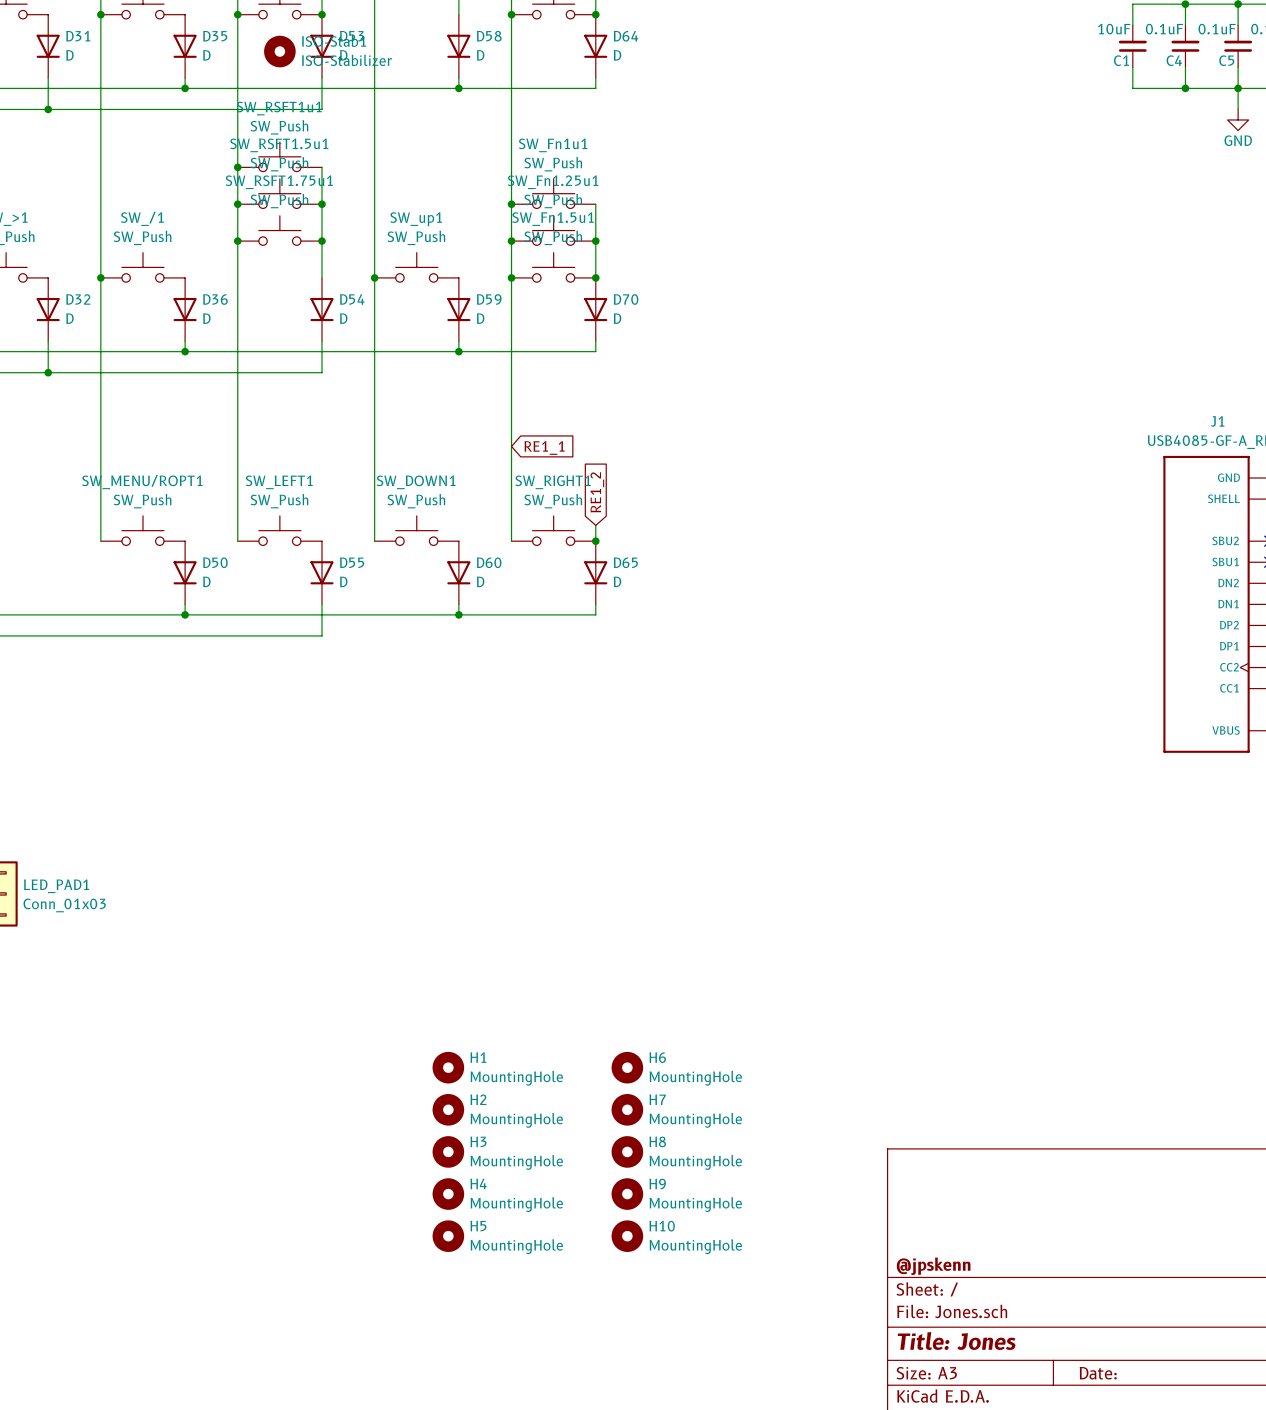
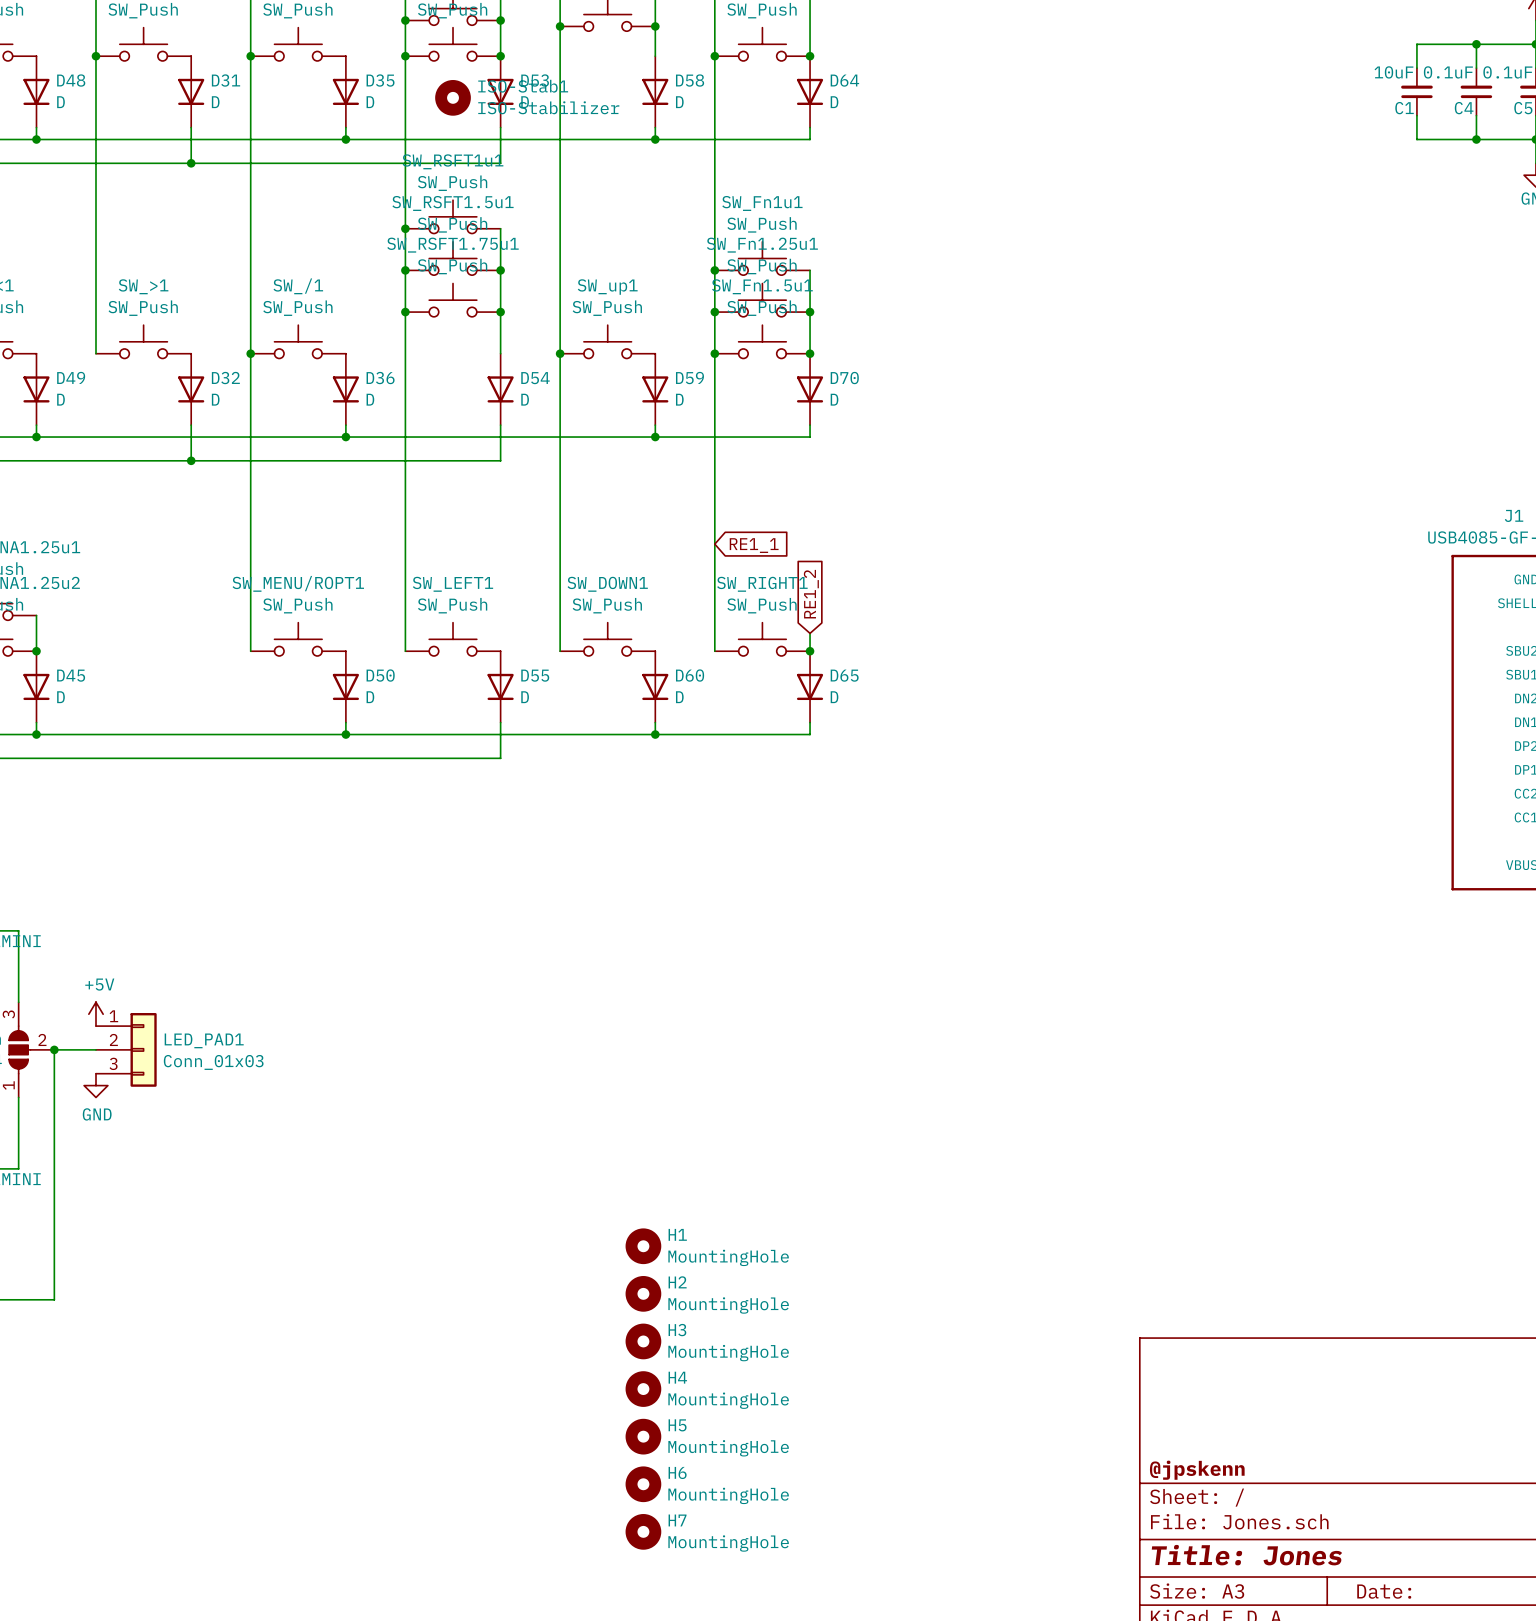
H6 position: (627, 1067) -> (643, 1484)
H7 position: (627, 1109) -> (643, 1531)
H8: MountingHole (627, 1151) -> none
H9: MountingHole (627, 1194) -> none
H10: MountingHole (627, 1236) -> none

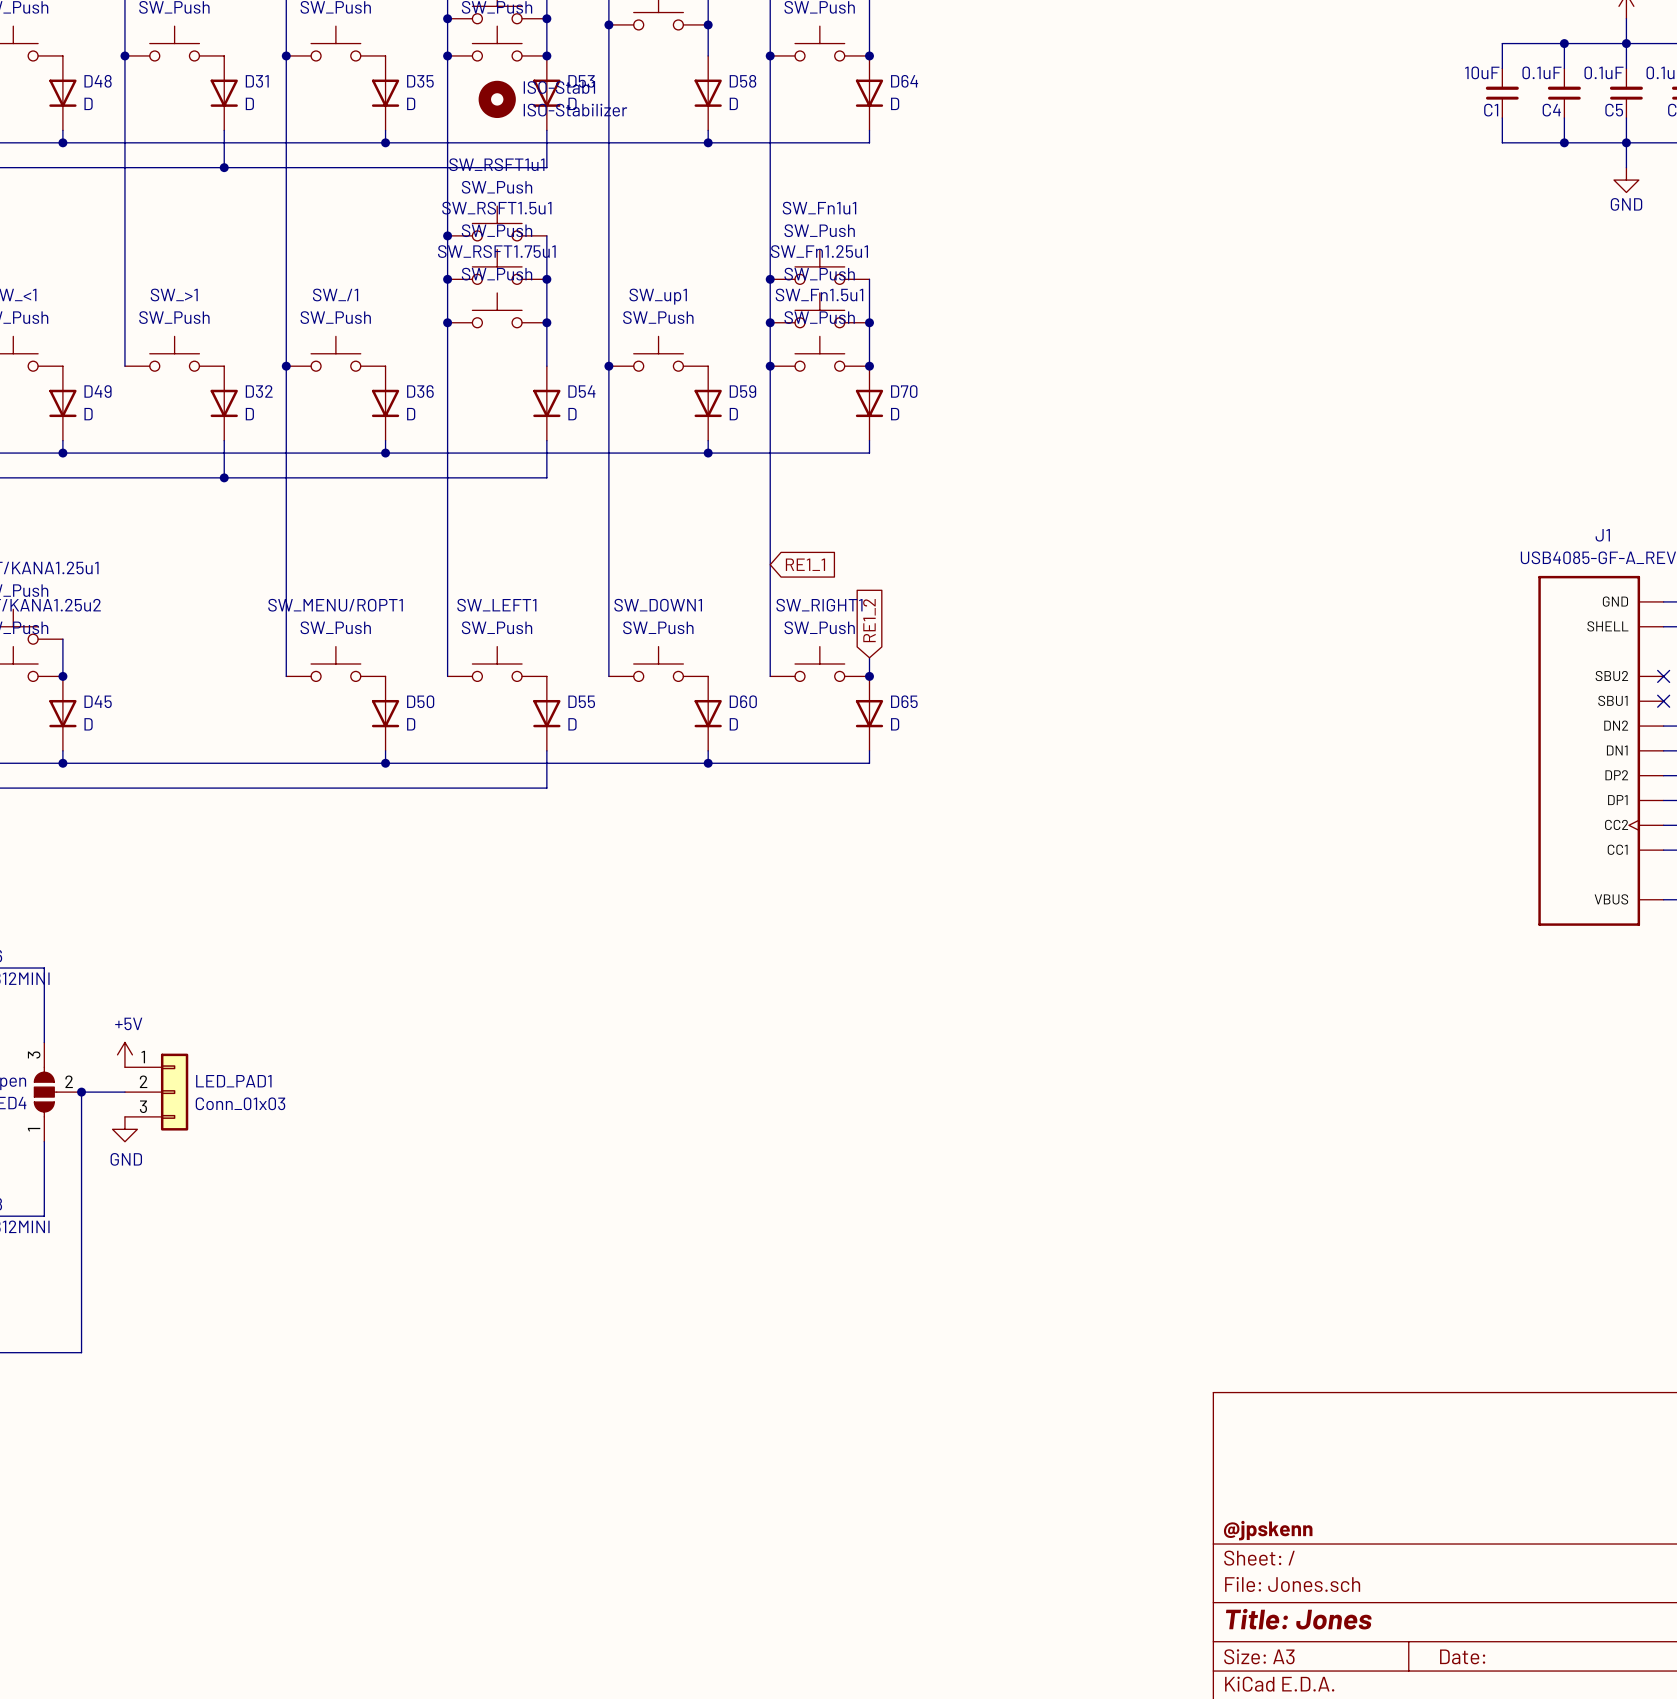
H1: MountingHole (643, 1246) -> none
H2: MountingHole (643, 1293) -> none
H3: MountingHole (643, 1341) -> none
H4: MountingHole (643, 1389) -> none
H5: MountingHole (643, 1436) -> none
H6: MountingHole (643, 1484) -> none
H7: MountingHole (643, 1531) -> none

